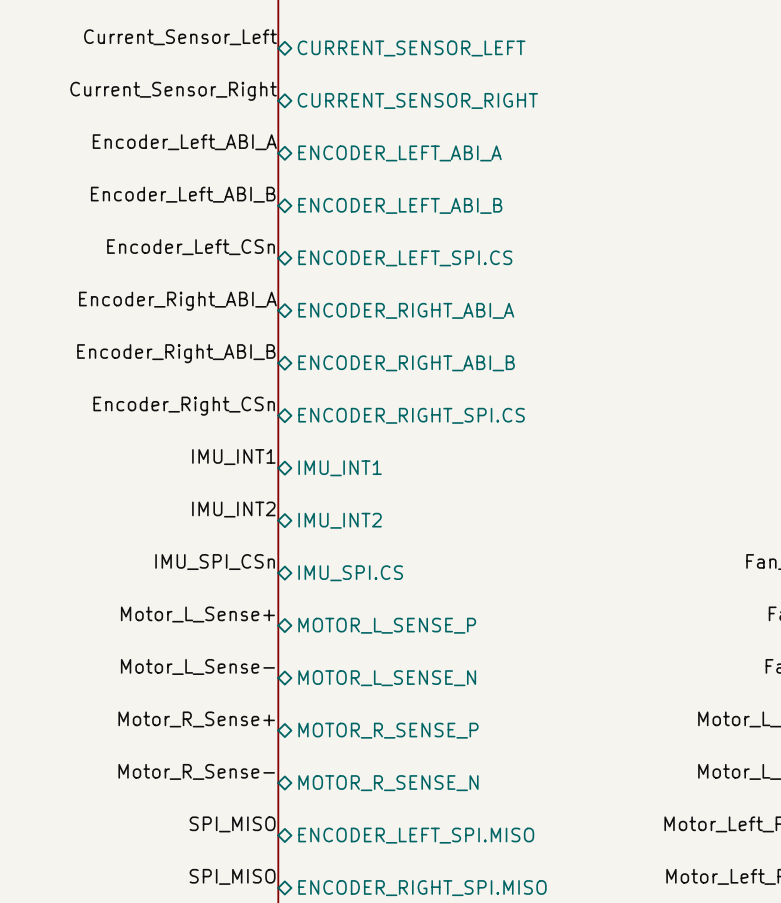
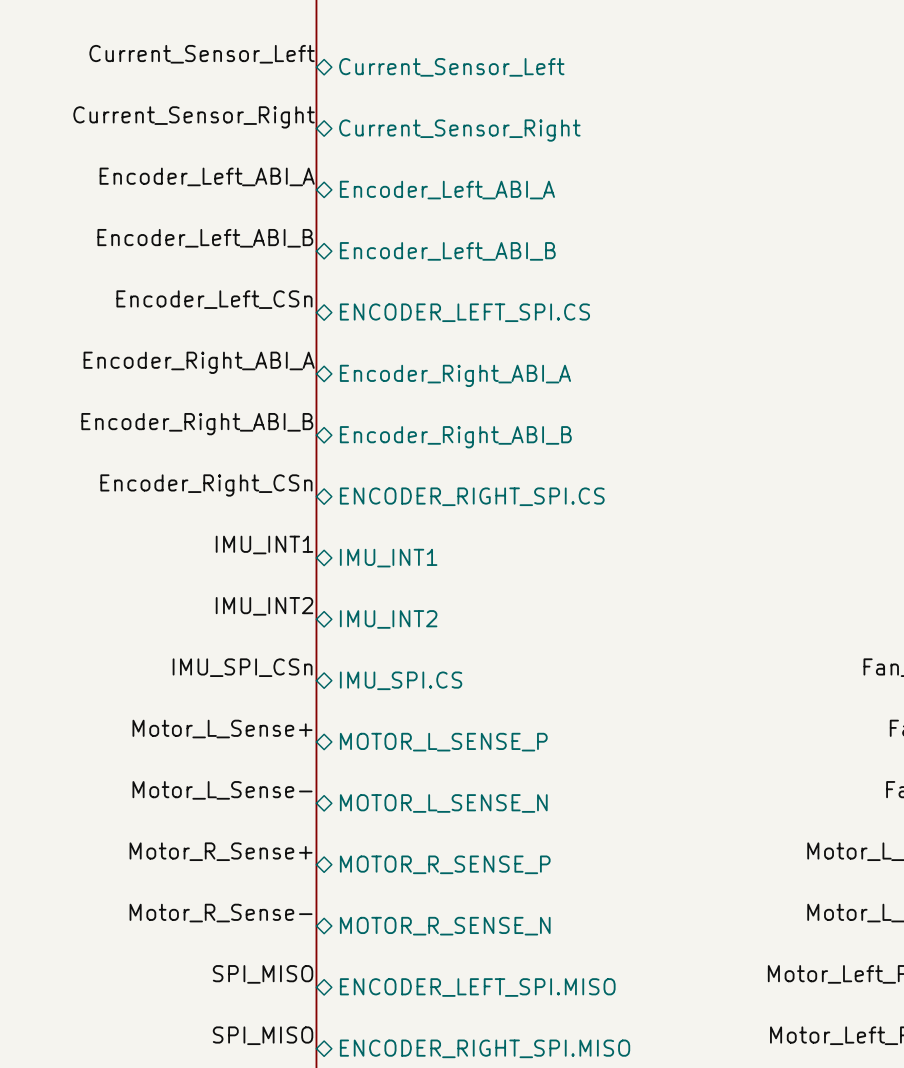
sheet pin: CURRENT_SENSOR_LEFT (411, 48) -> Current_Sensor_Left (451, 67)
sheet pin: CURRENT_SENSOR_RIGHT (417, 100) -> Current_Sensor_Right (459, 130)
sheet pin: ENCODER_LEFT_ABI_A (400, 153) -> Encoder_Left_ABI_A (447, 190)
sheet pin: ENCODER_LEFT_ABI_B (400, 205) -> Encoder_Left_ABI_B (447, 251)
sheet pin: ENCODER_RIGHT_ABI_A (406, 310) -> Encoder_Right_ABI_A (455, 375)
sheet pin: ENCODER_RIGHT_ABI_B (406, 363) -> Encoder_Right_ABI_B (455, 437)

